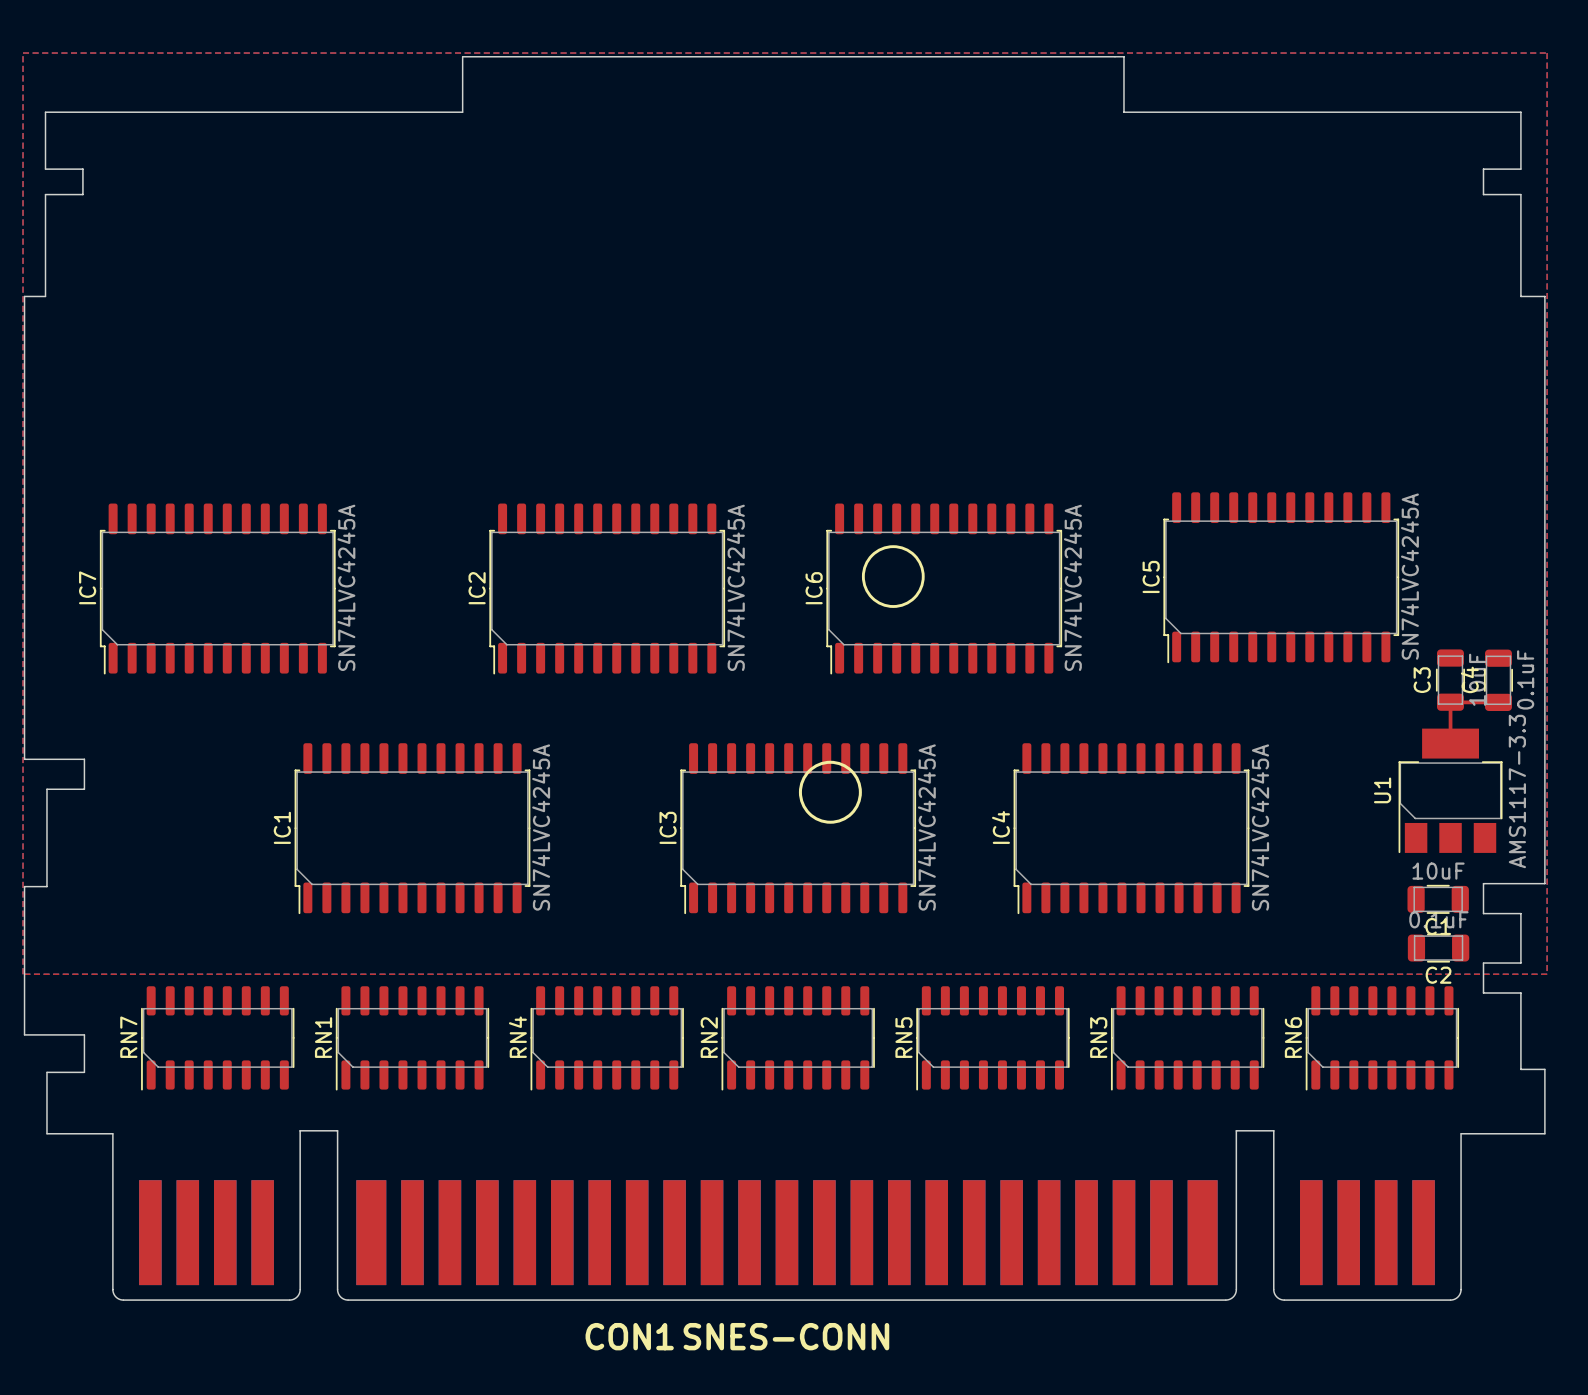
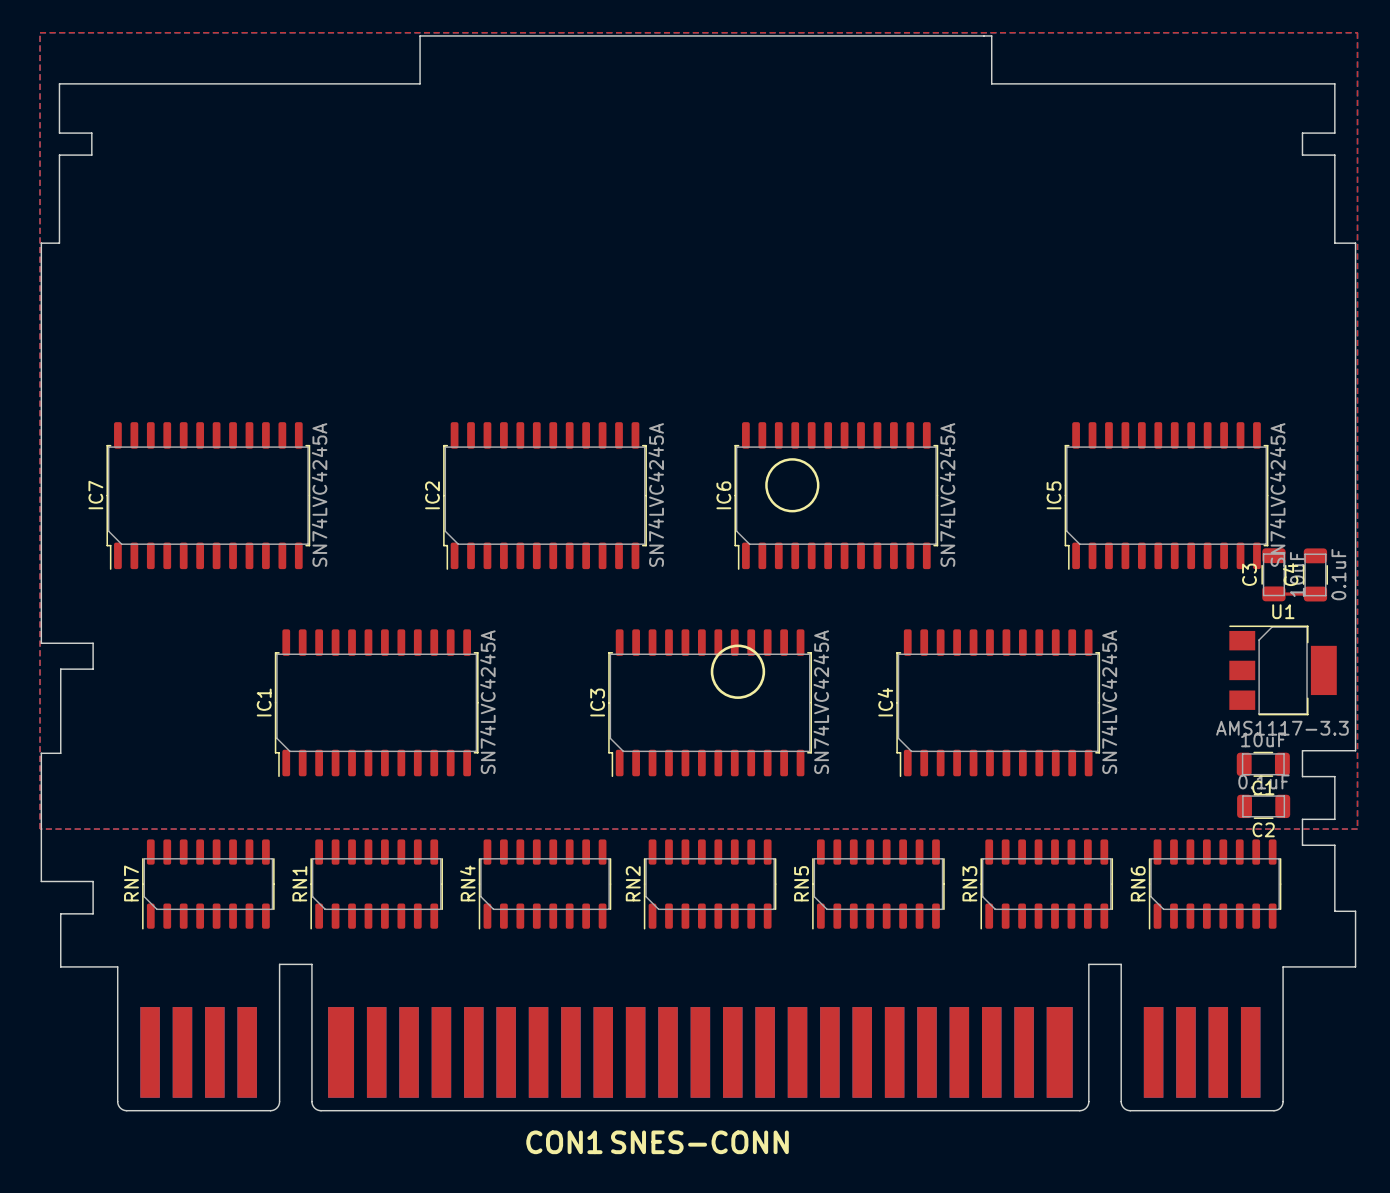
IC5 position: (1281, 577) -> (1166, 496)
top track: (1450, 702) (1450, 743) -> none
U1 rotation: 0° (1450, 790) -> 90° clockwise (1282, 670)

